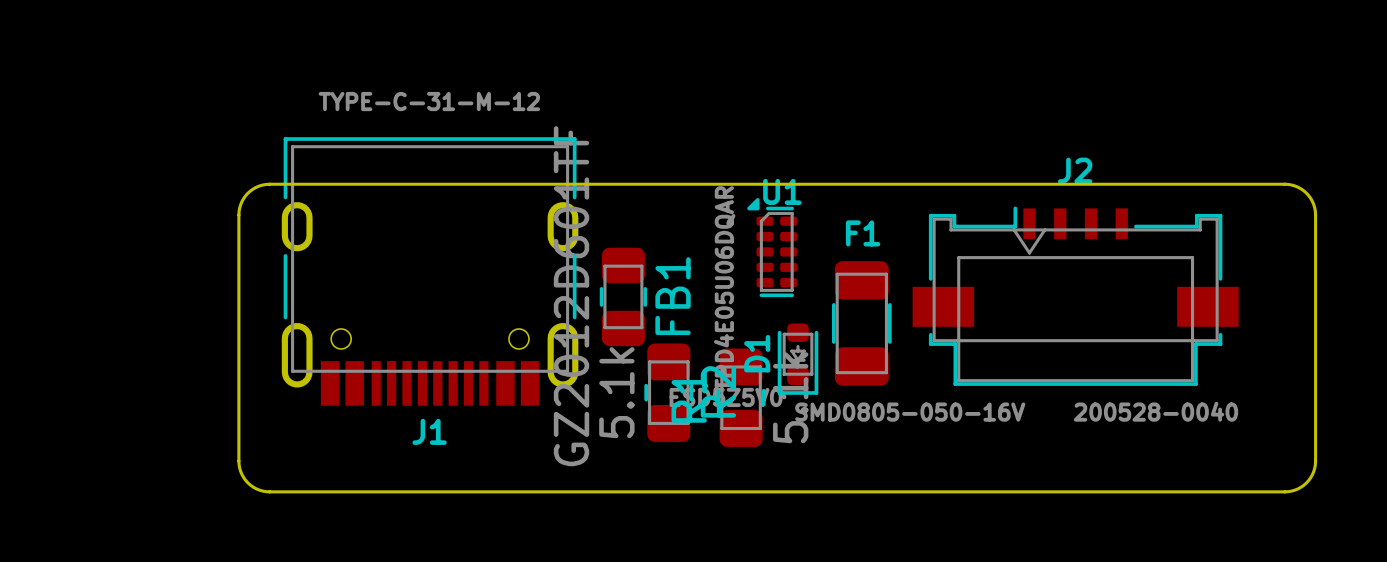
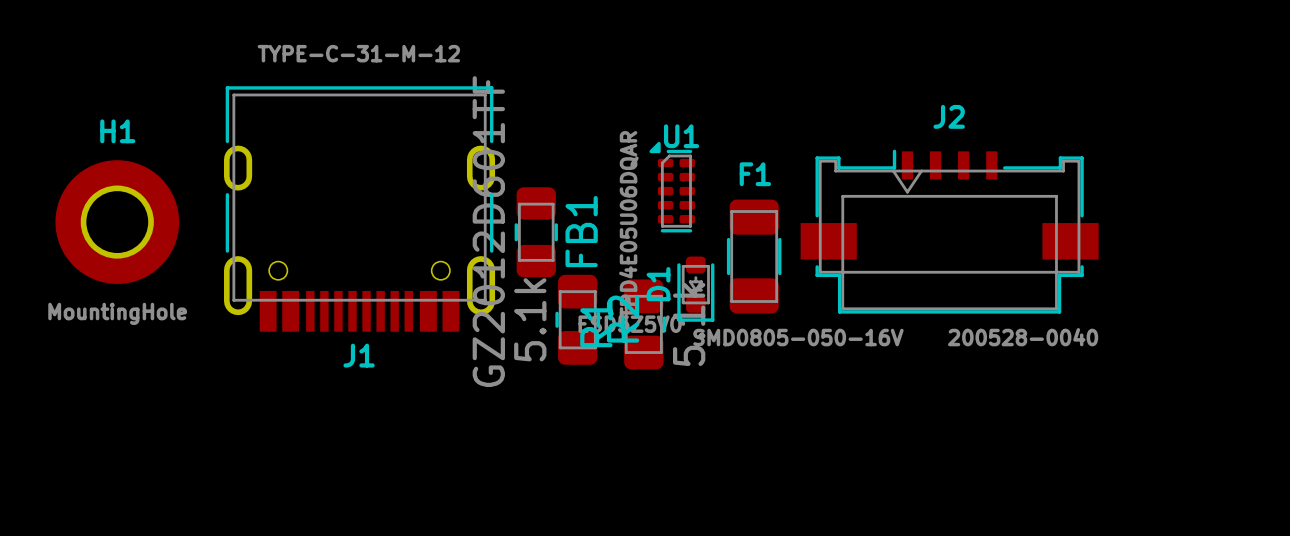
board edge: (269, 184) (1291, 185) (1306, 193) (1312, 201) (1315, 211) (1314, 467) (1310, 477) (1304, 485) (1294, 490) (1284, 491) (262, 491) (253, 487) (245, 480) (239, 464) (238, 215) (241, 201) (247, 193) (256, 187) (269, 184) -> none
H1: none -> MountingHole (117, 222)

